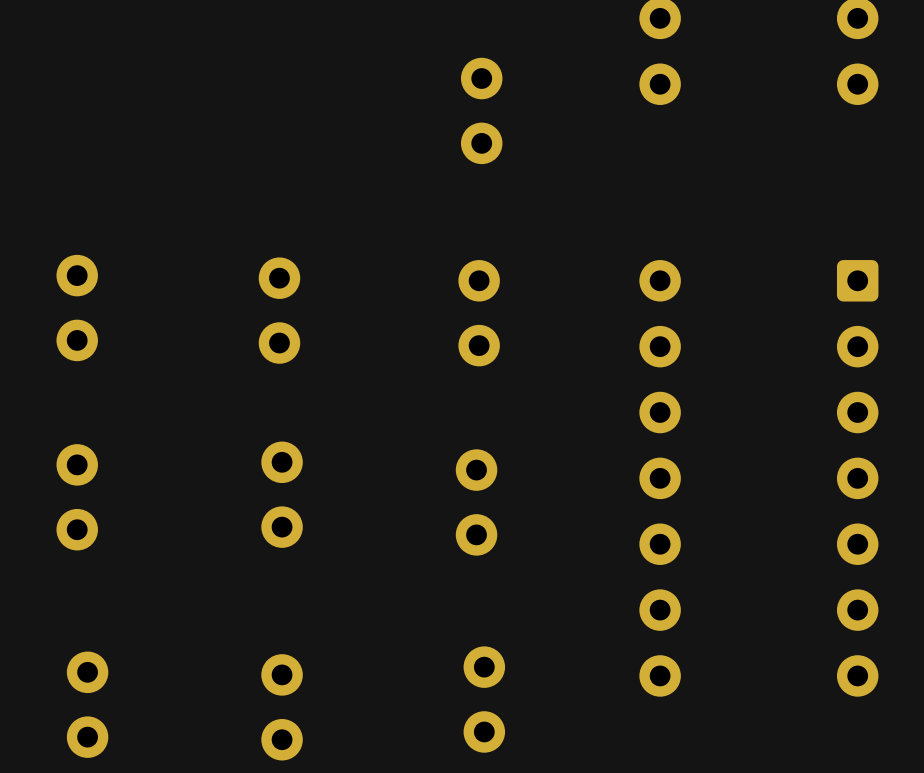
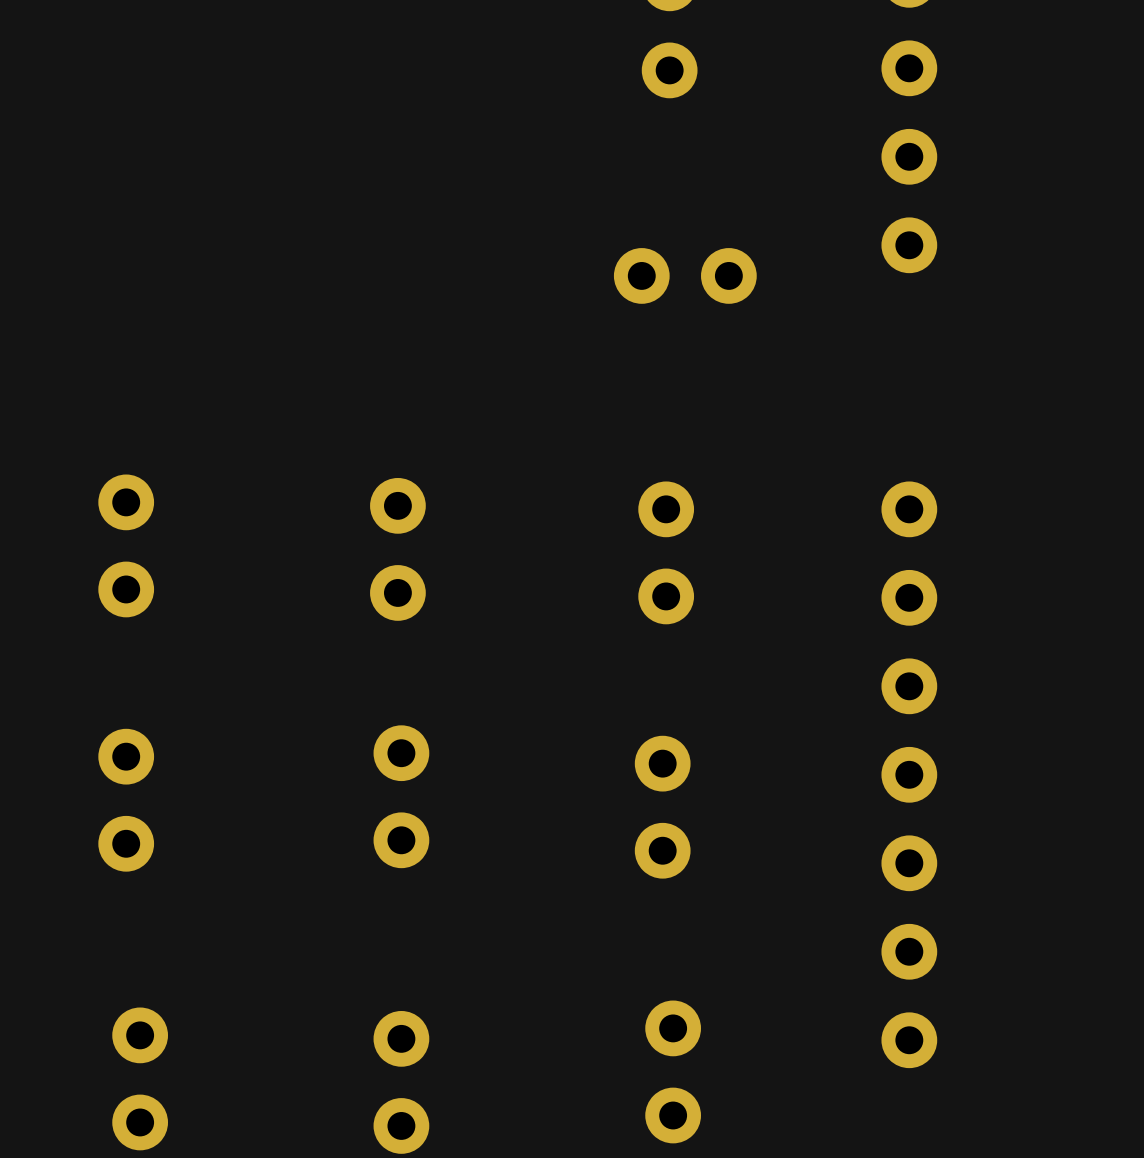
part rotation: 0° (481, 110) -> 90° clockwise (685, 275)

